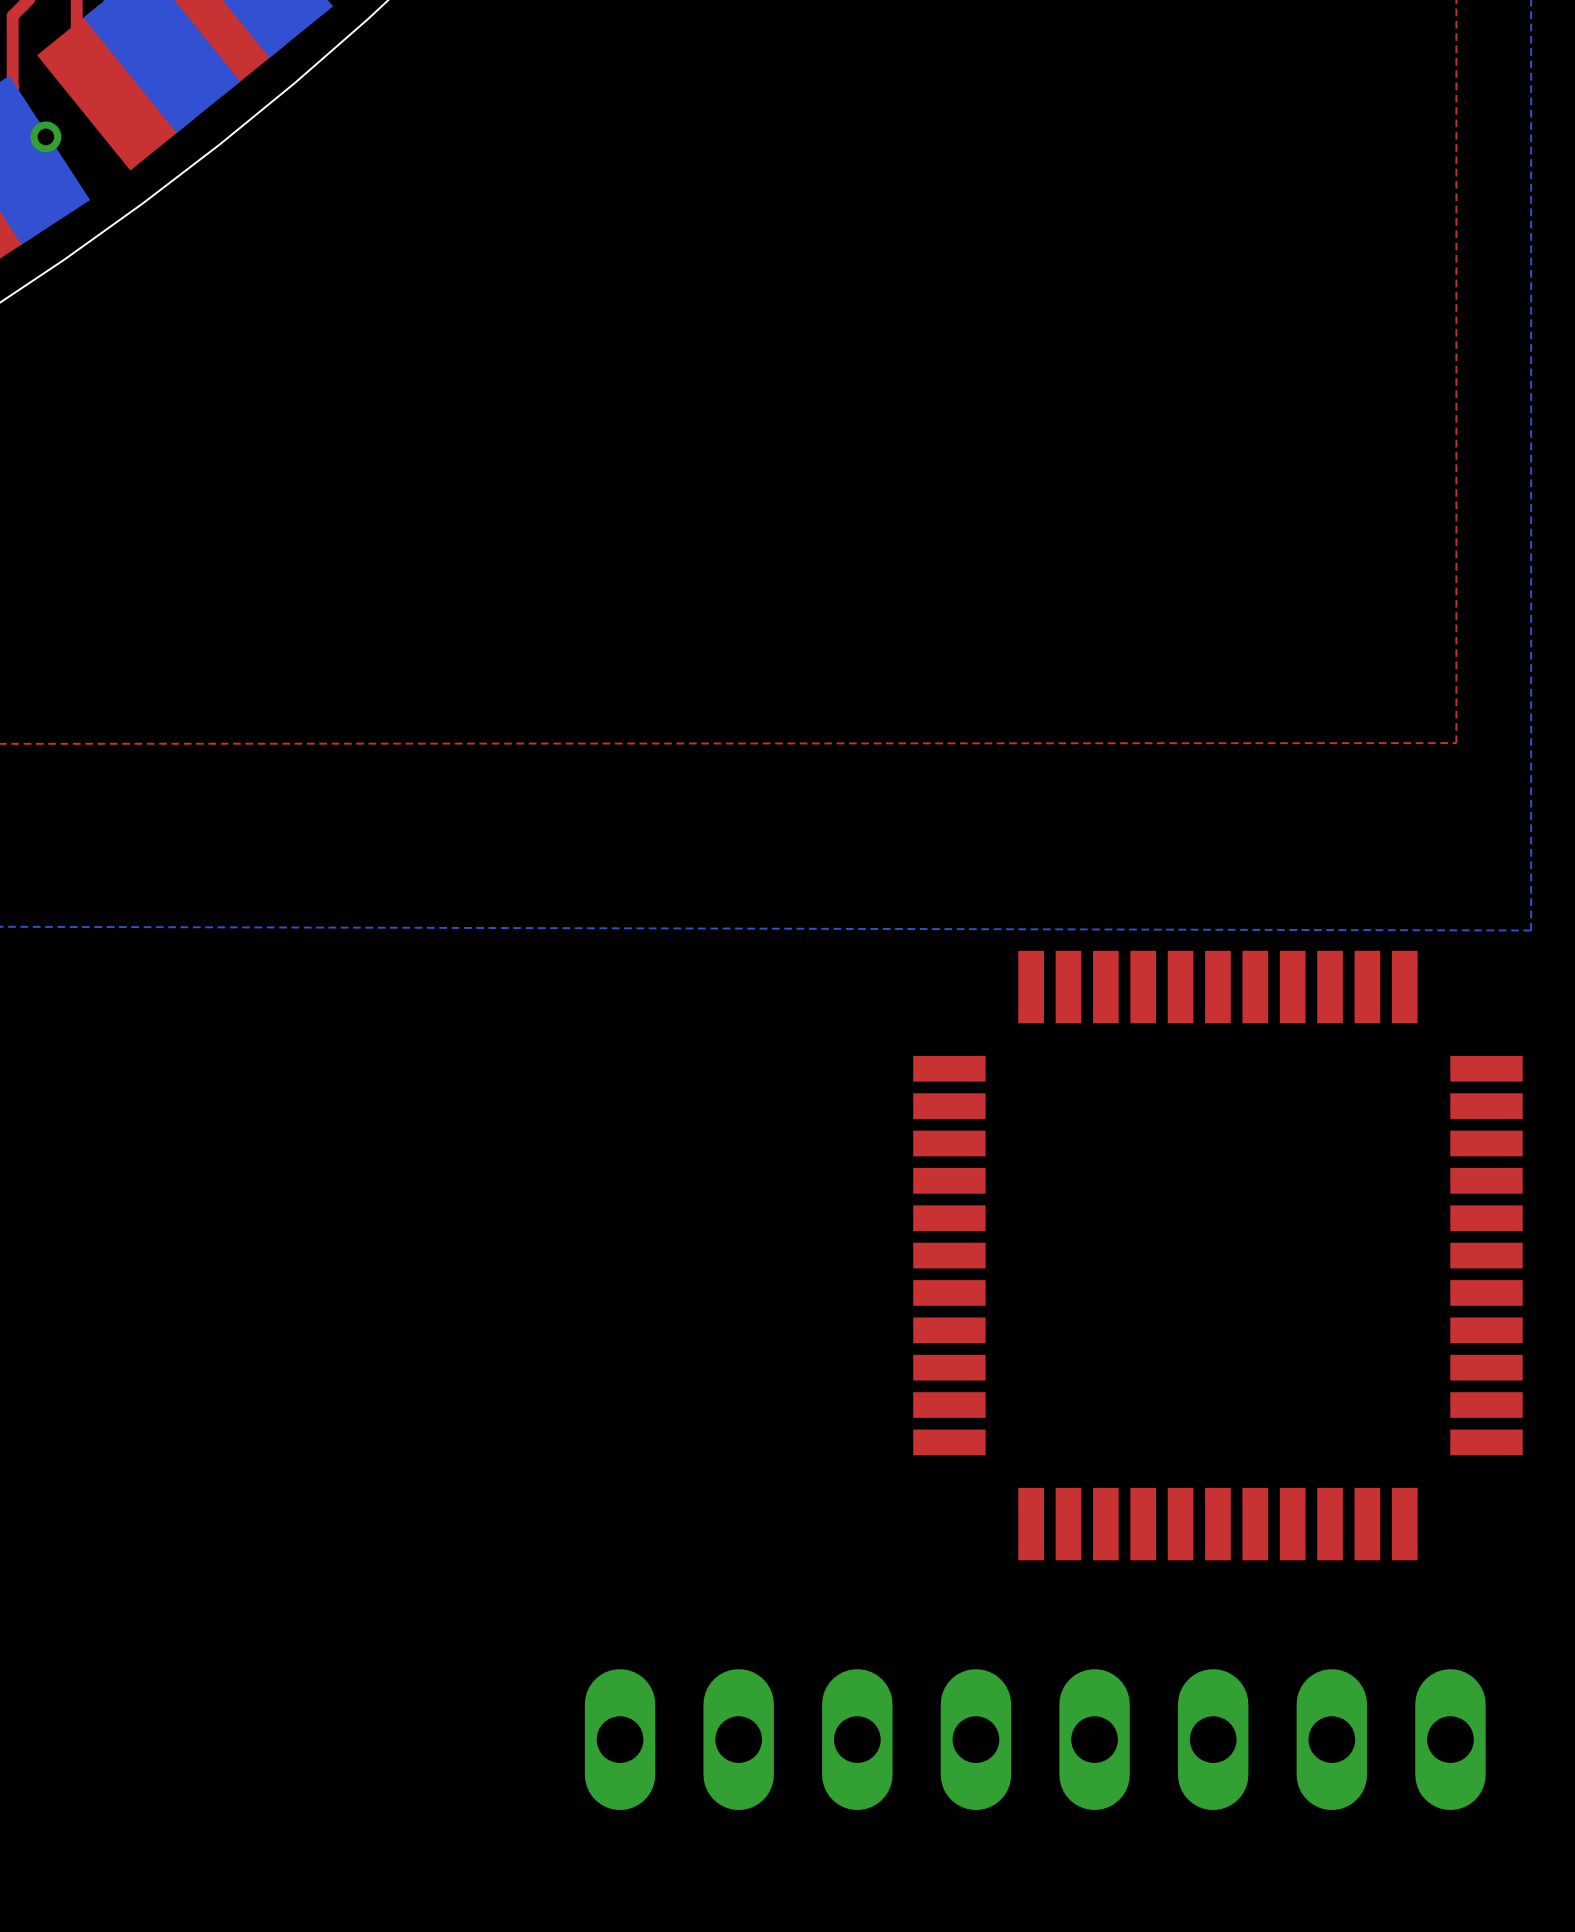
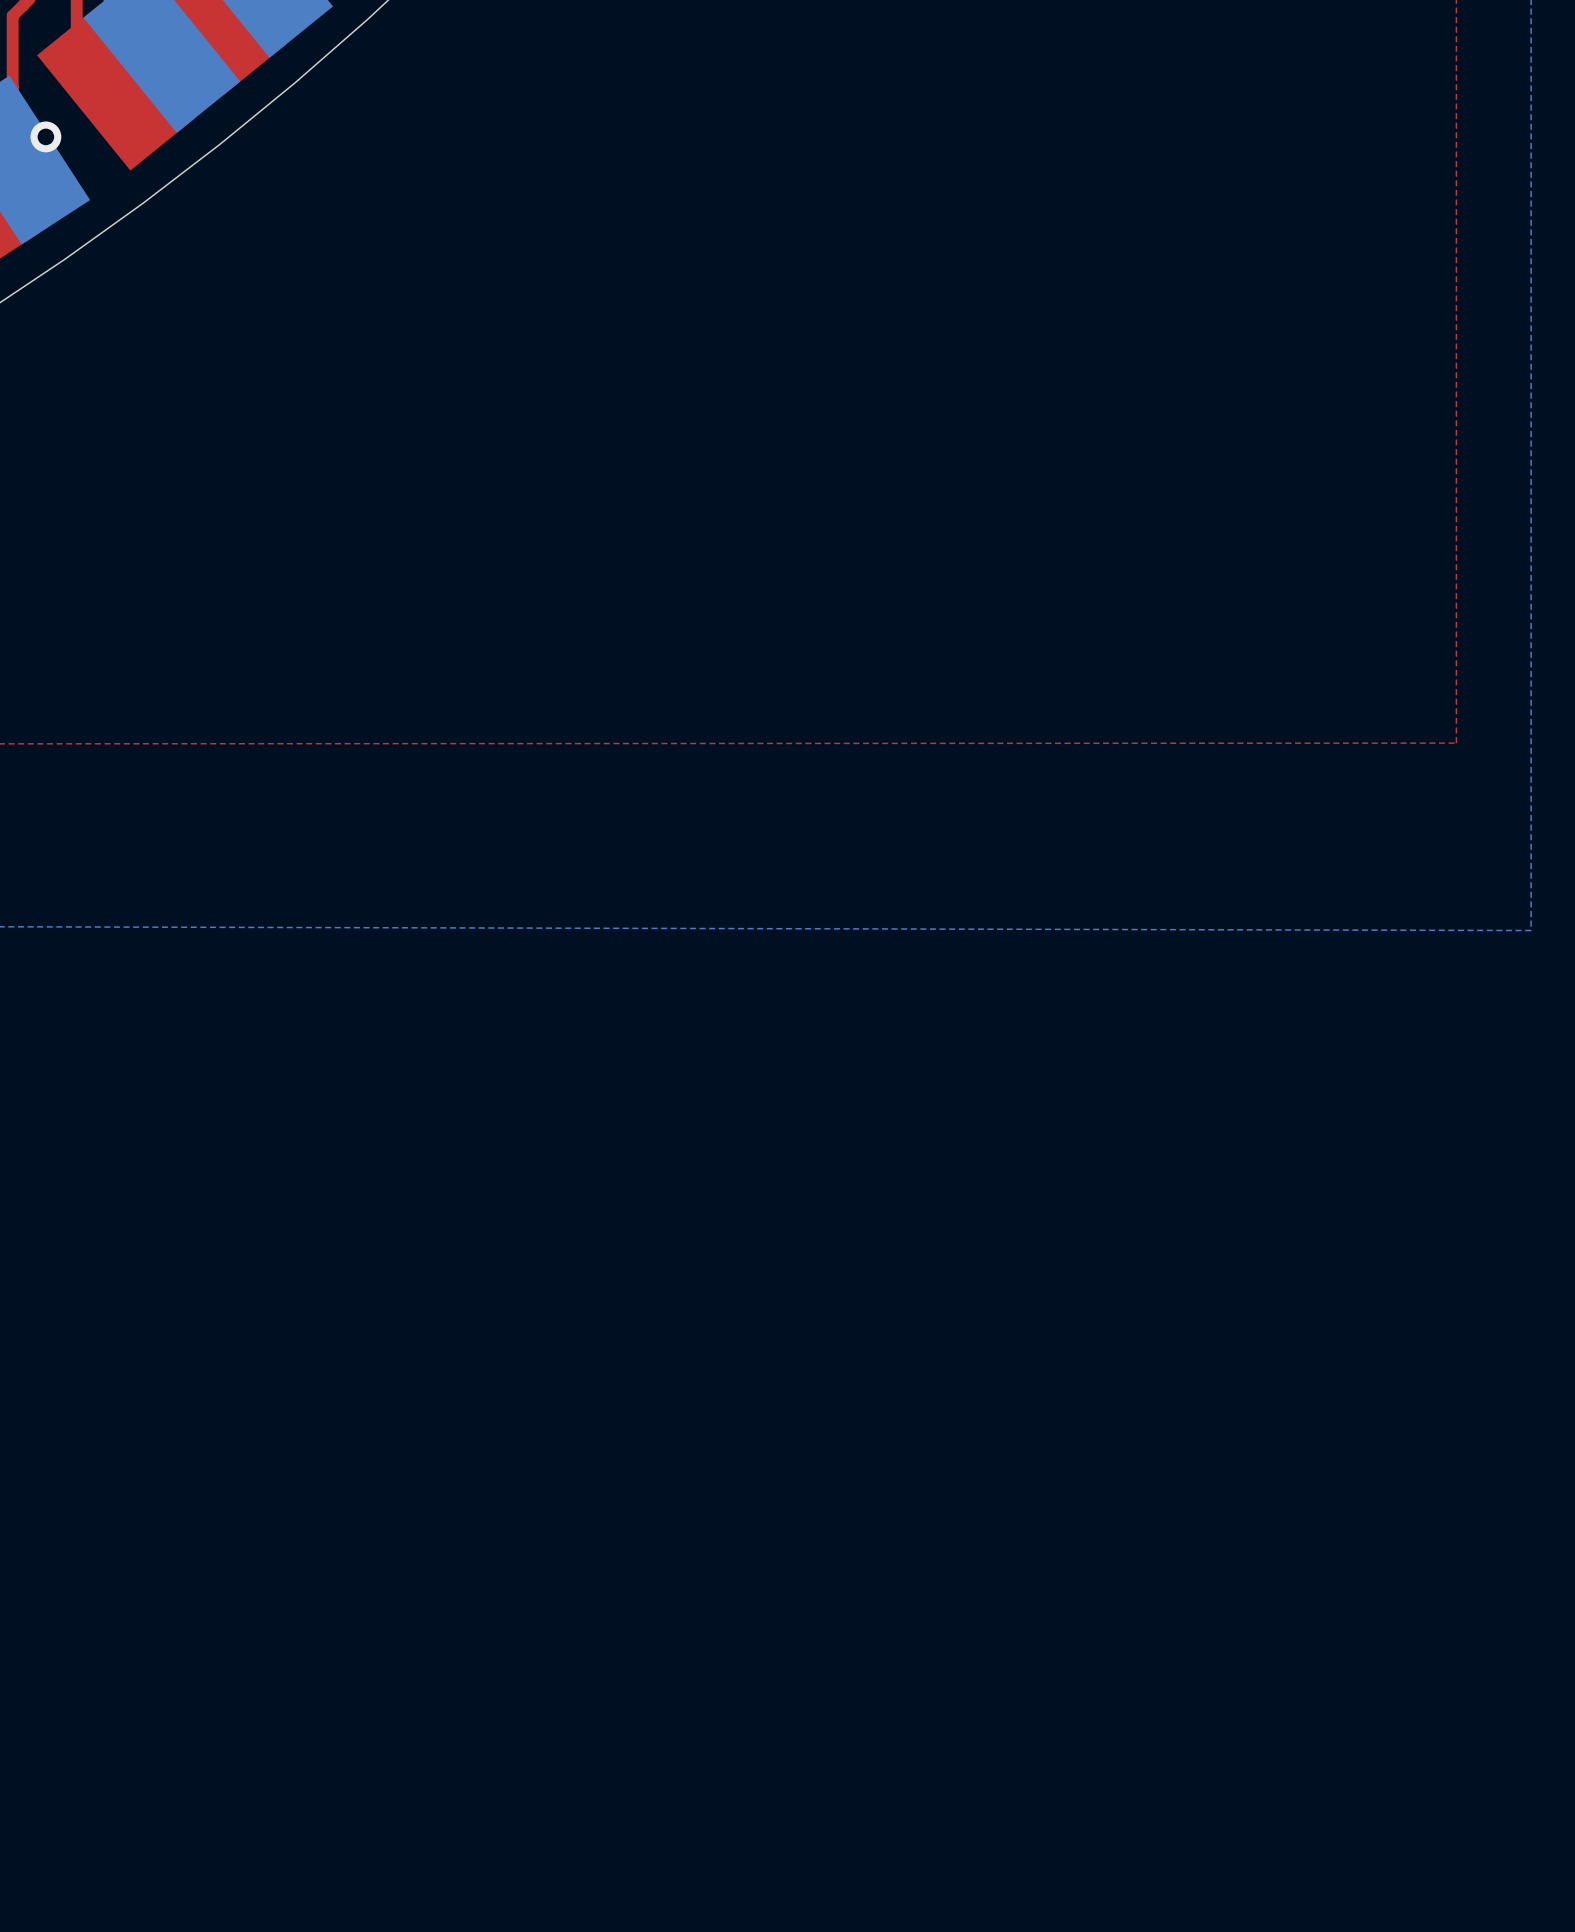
part: (1217, 1255) -> none
part: (1035, 1739) -> none

